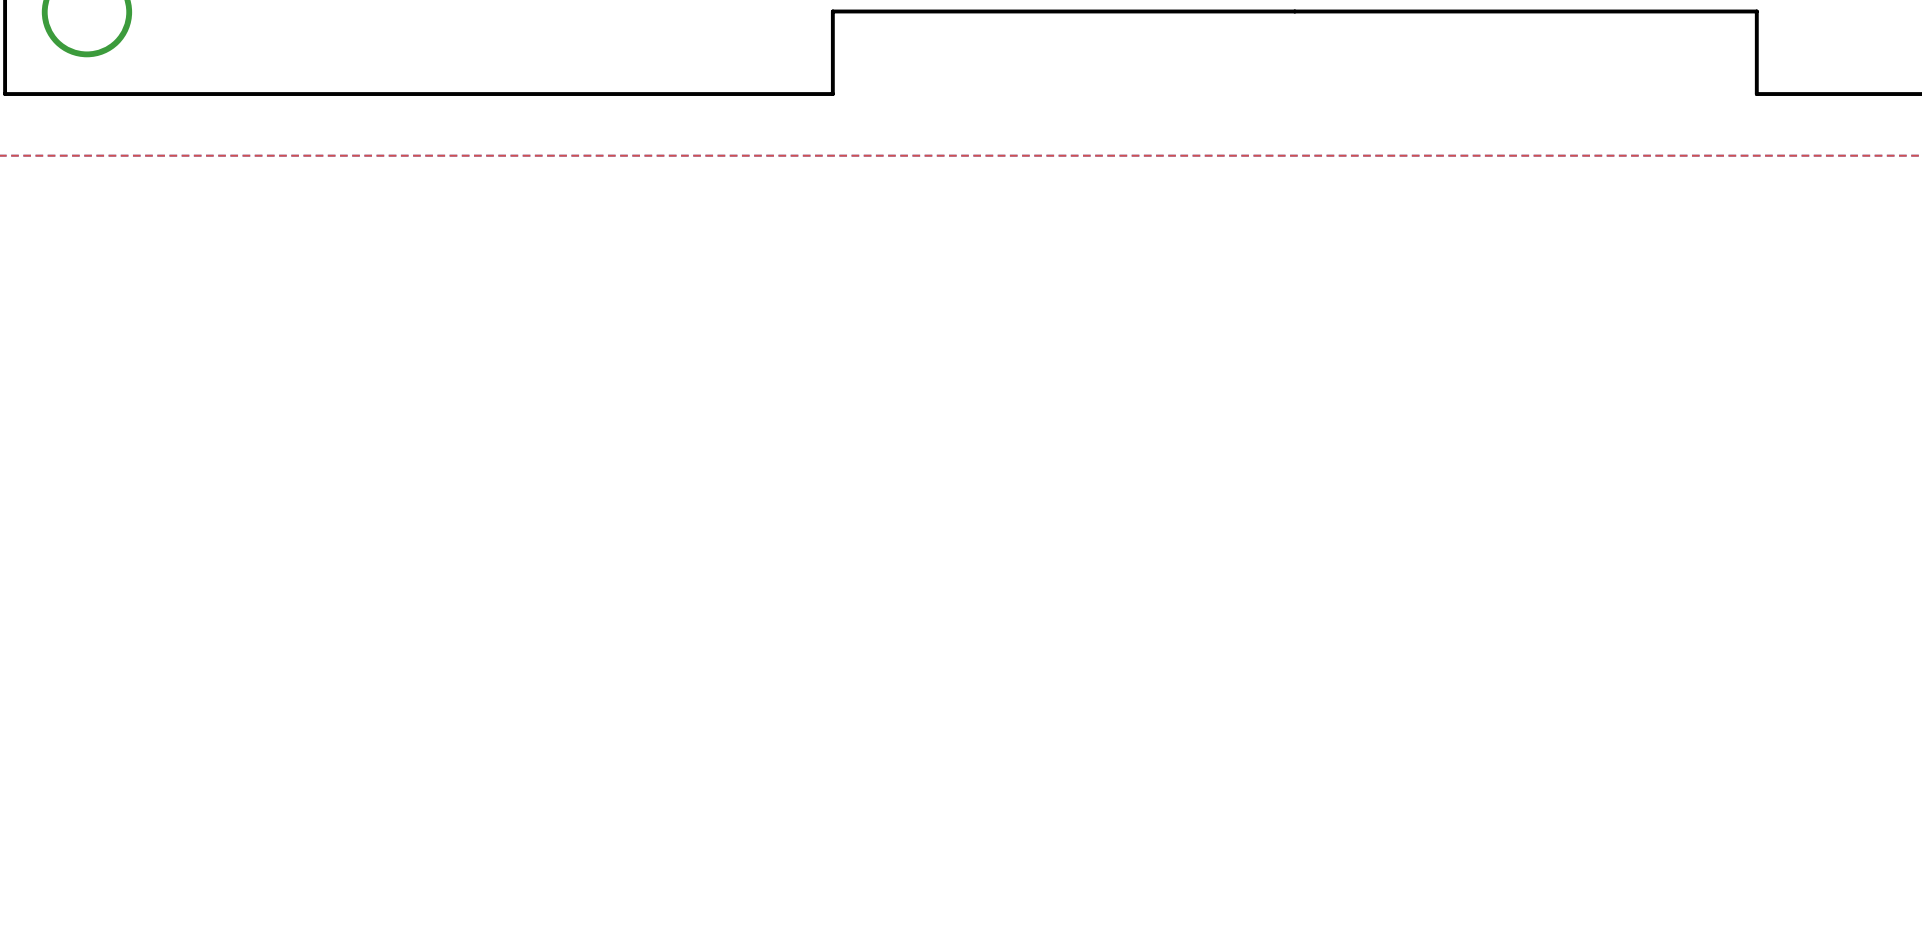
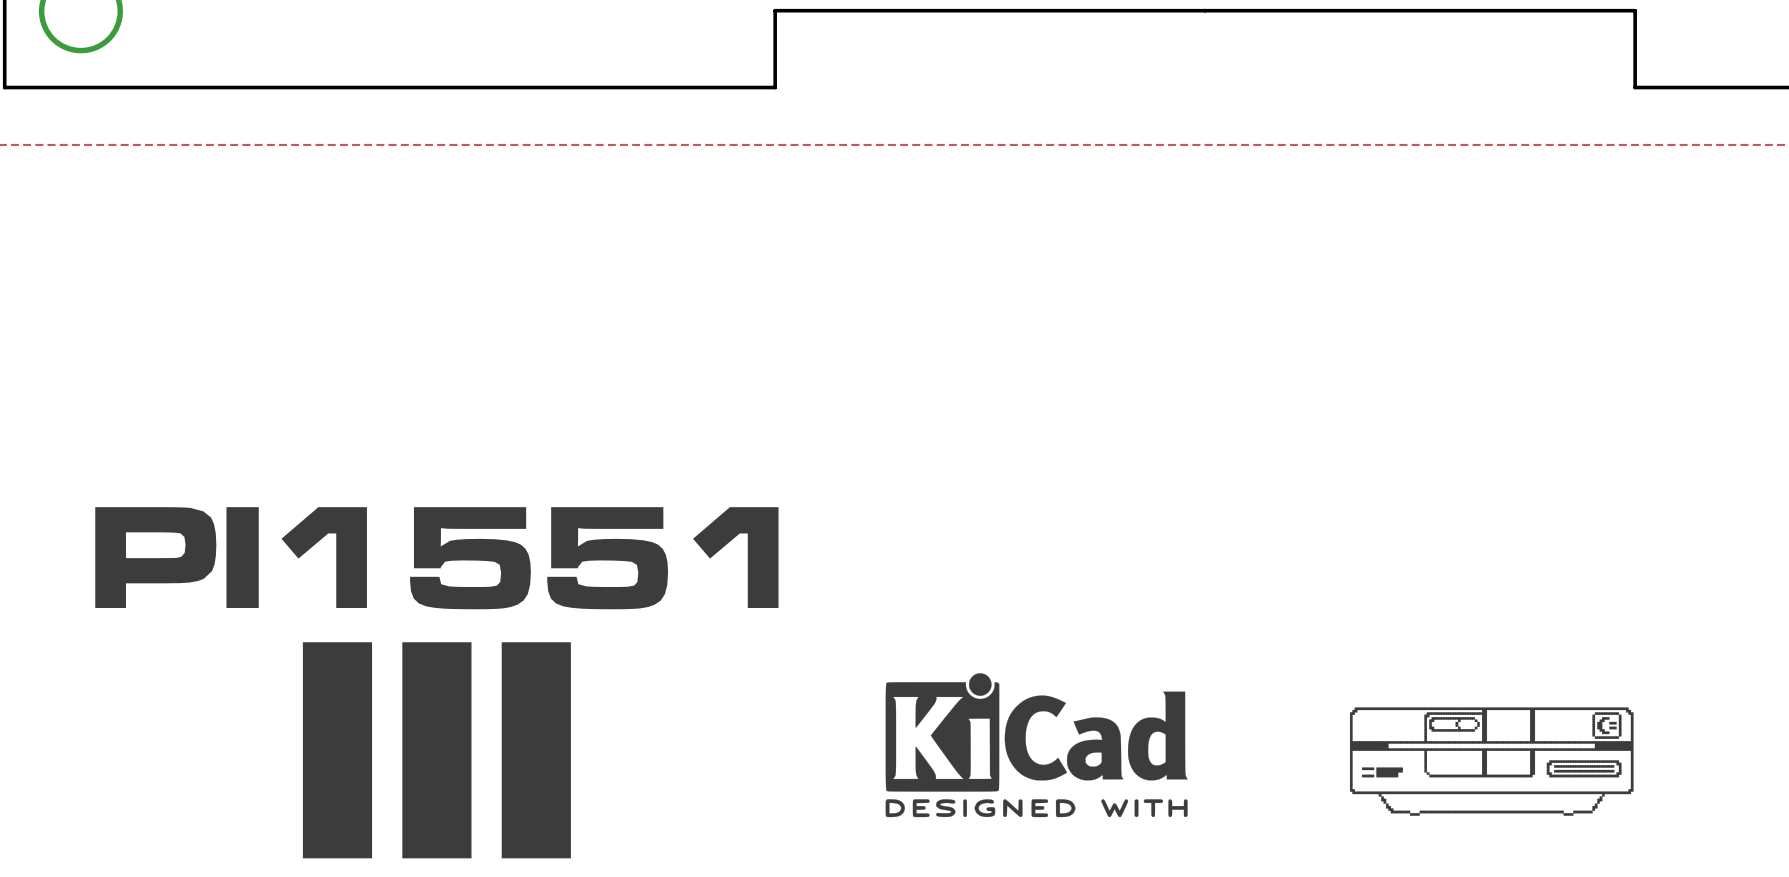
drawing: none -> [95, 507, 779, 610]
drawing: none -> [302, 642, 571, 859]
drawing: none -> [885, 673, 1188, 818]
drawing: none -> [1349, 707, 1634, 816]

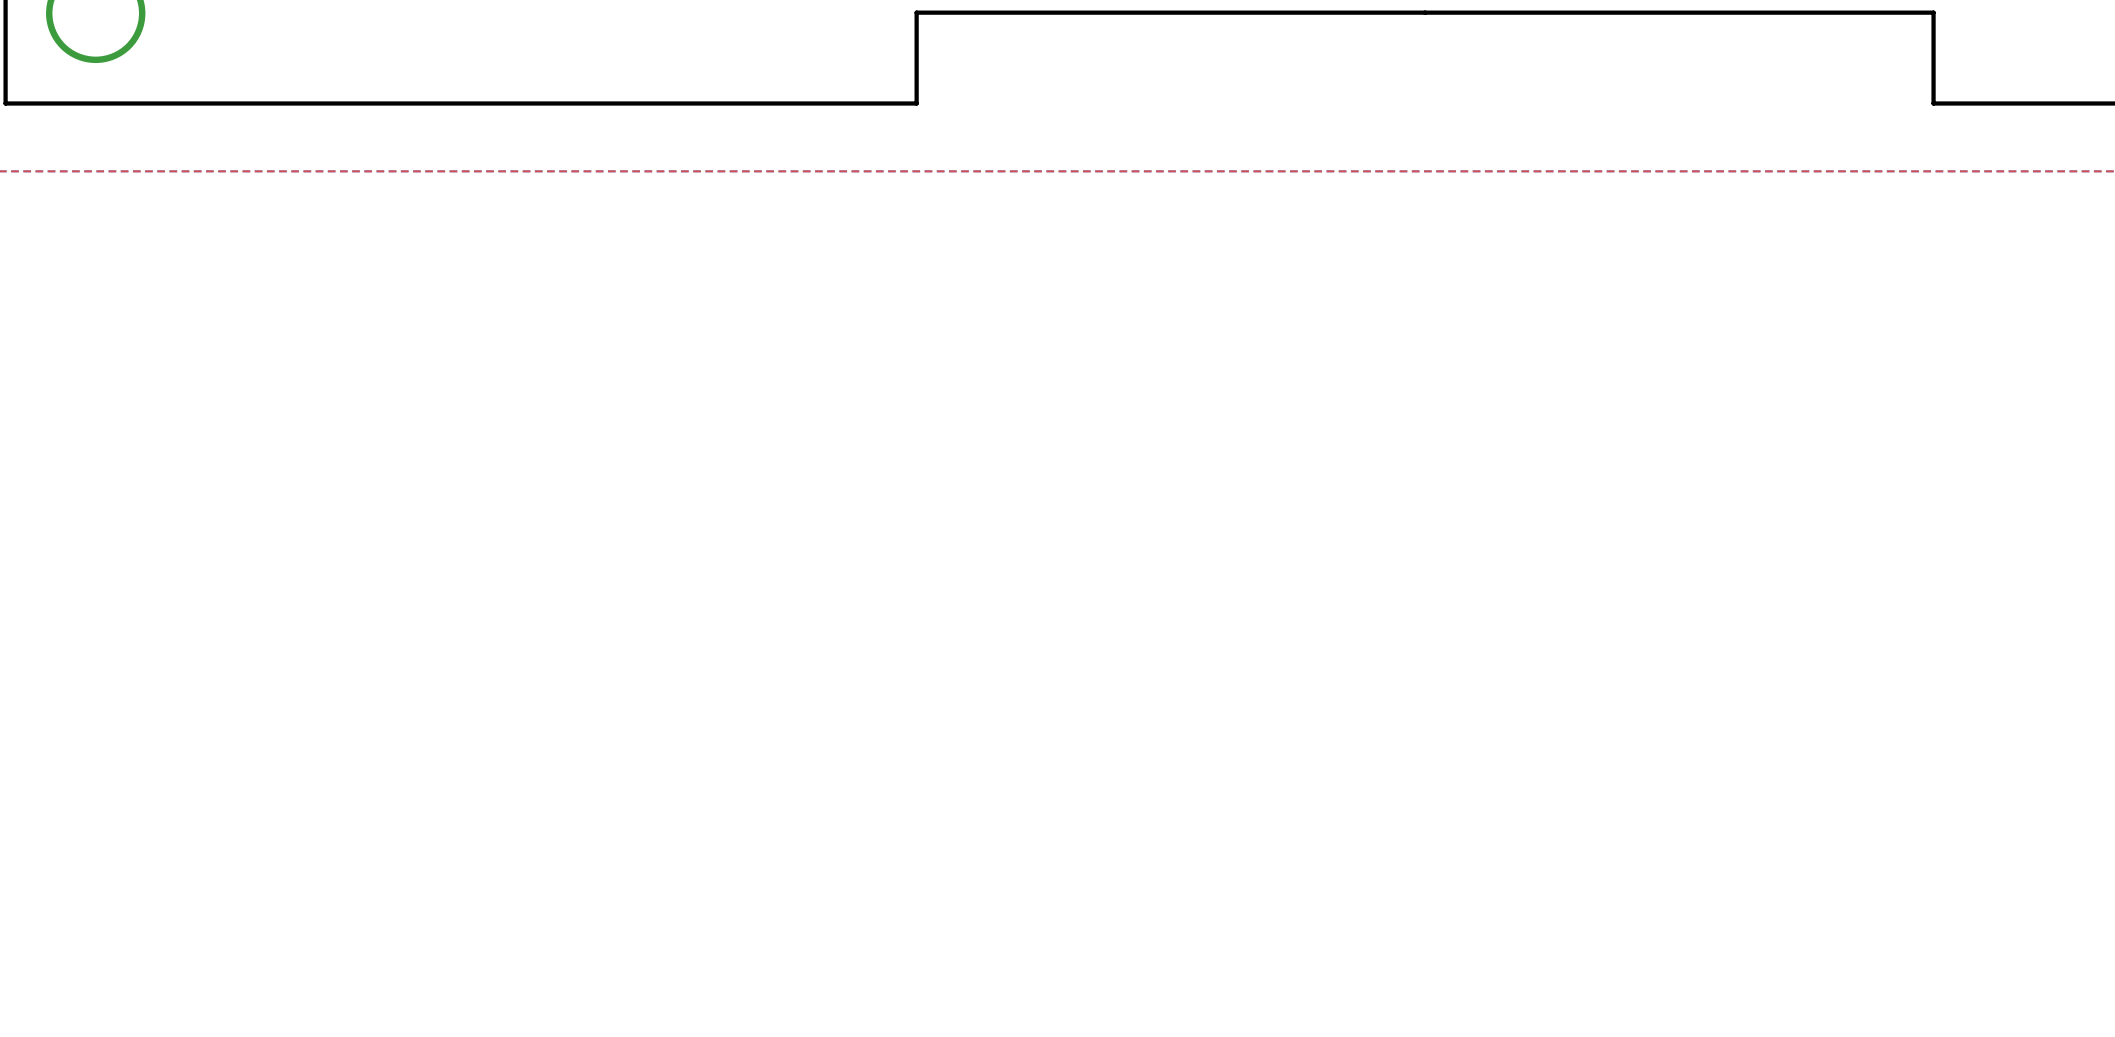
drawing: [95, 507, 779, 610] -> none
drawing: [302, 642, 571, 859] -> none
drawing: [885, 673, 1188, 818] -> none
drawing: [1349, 707, 1634, 816] -> none

